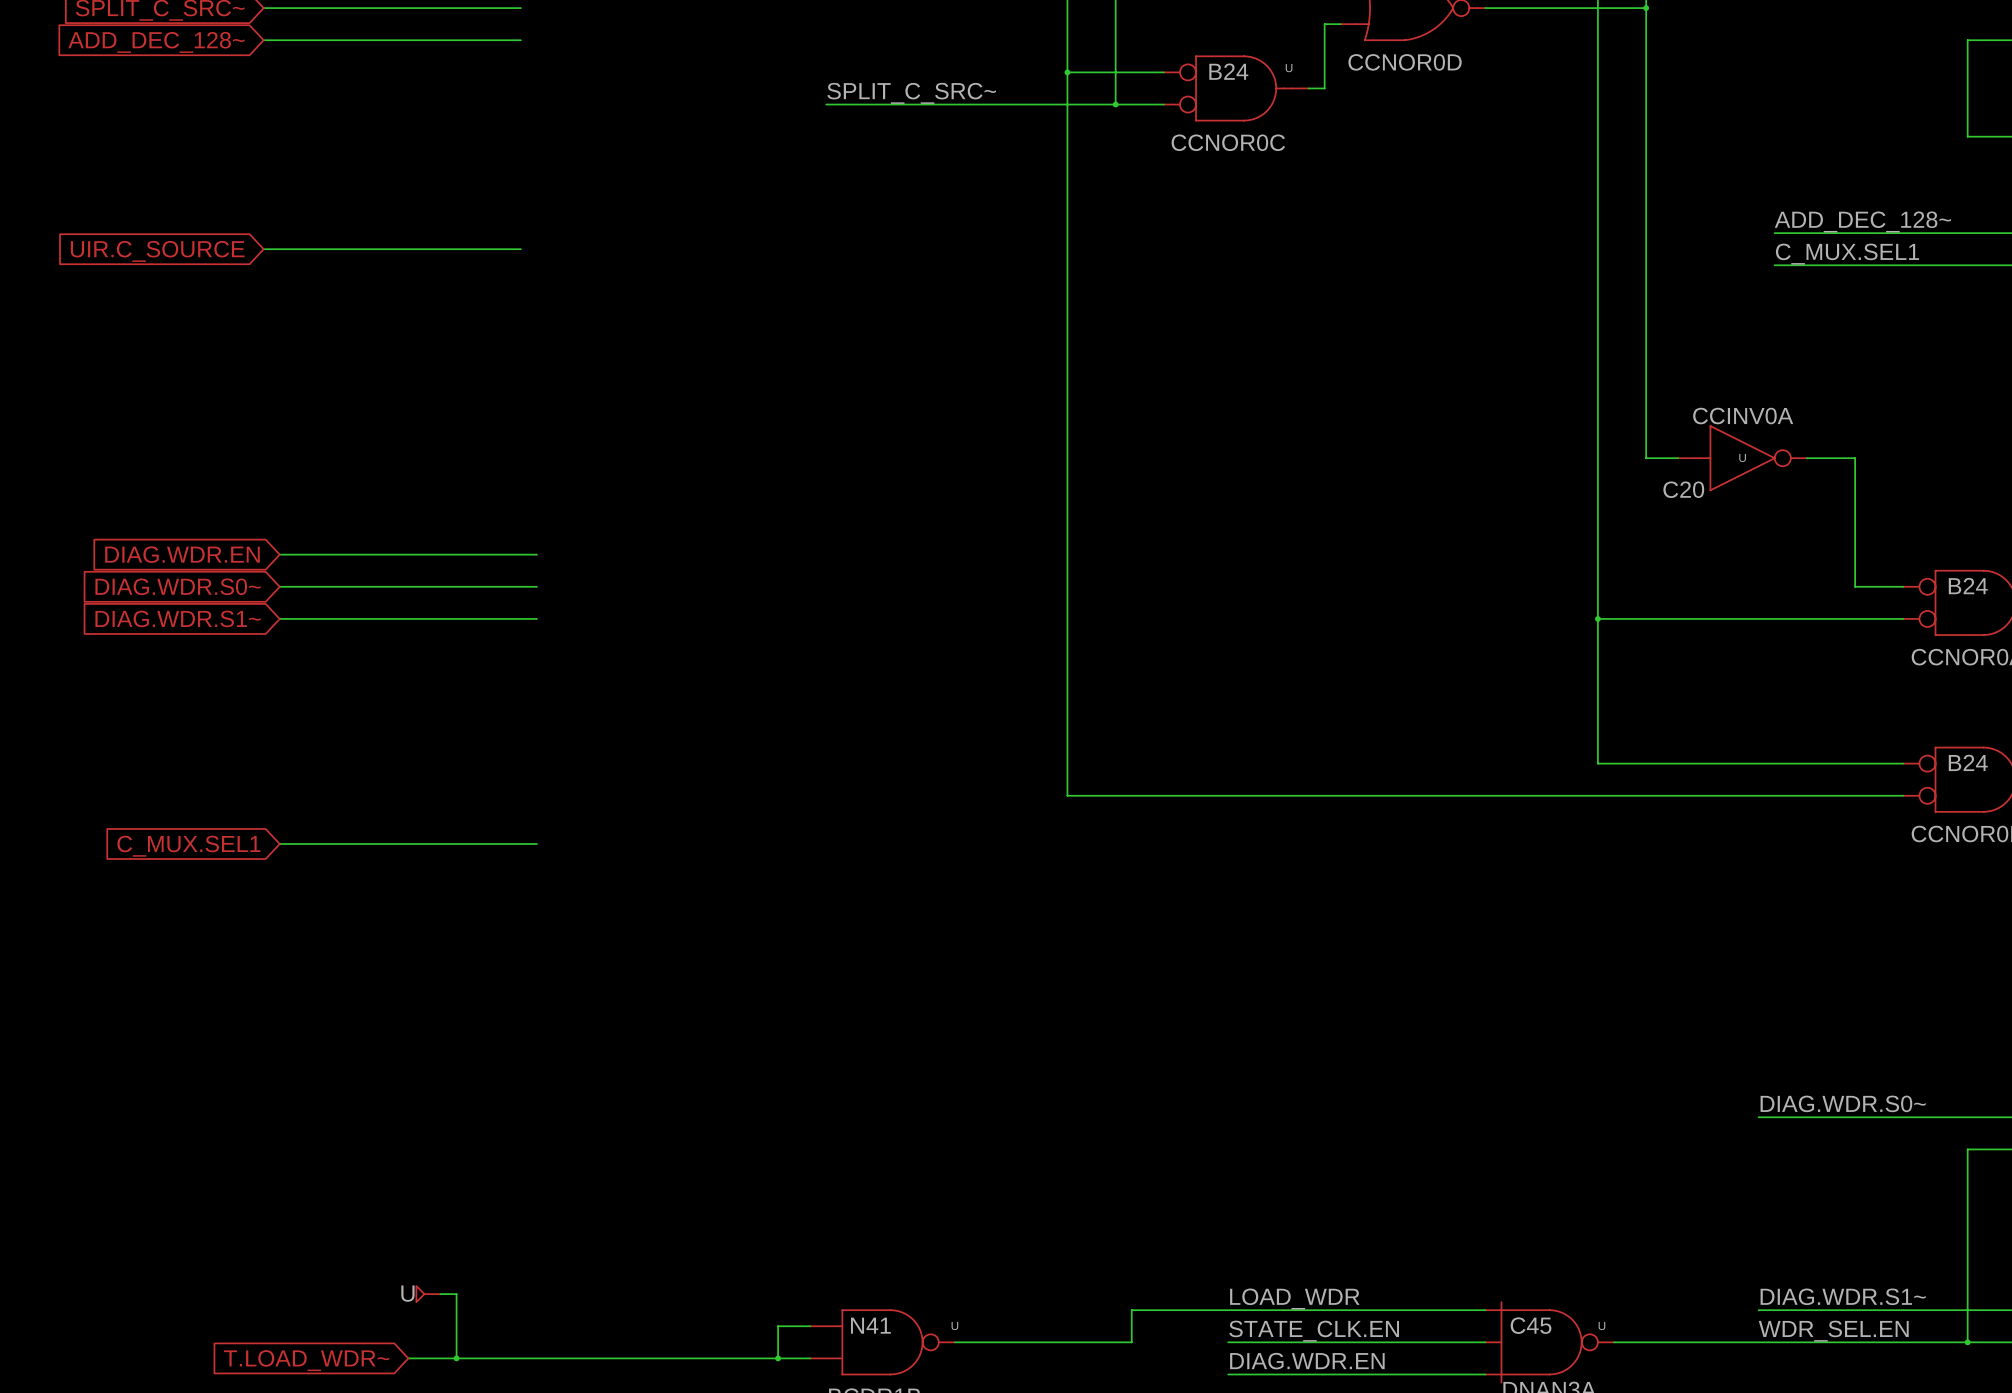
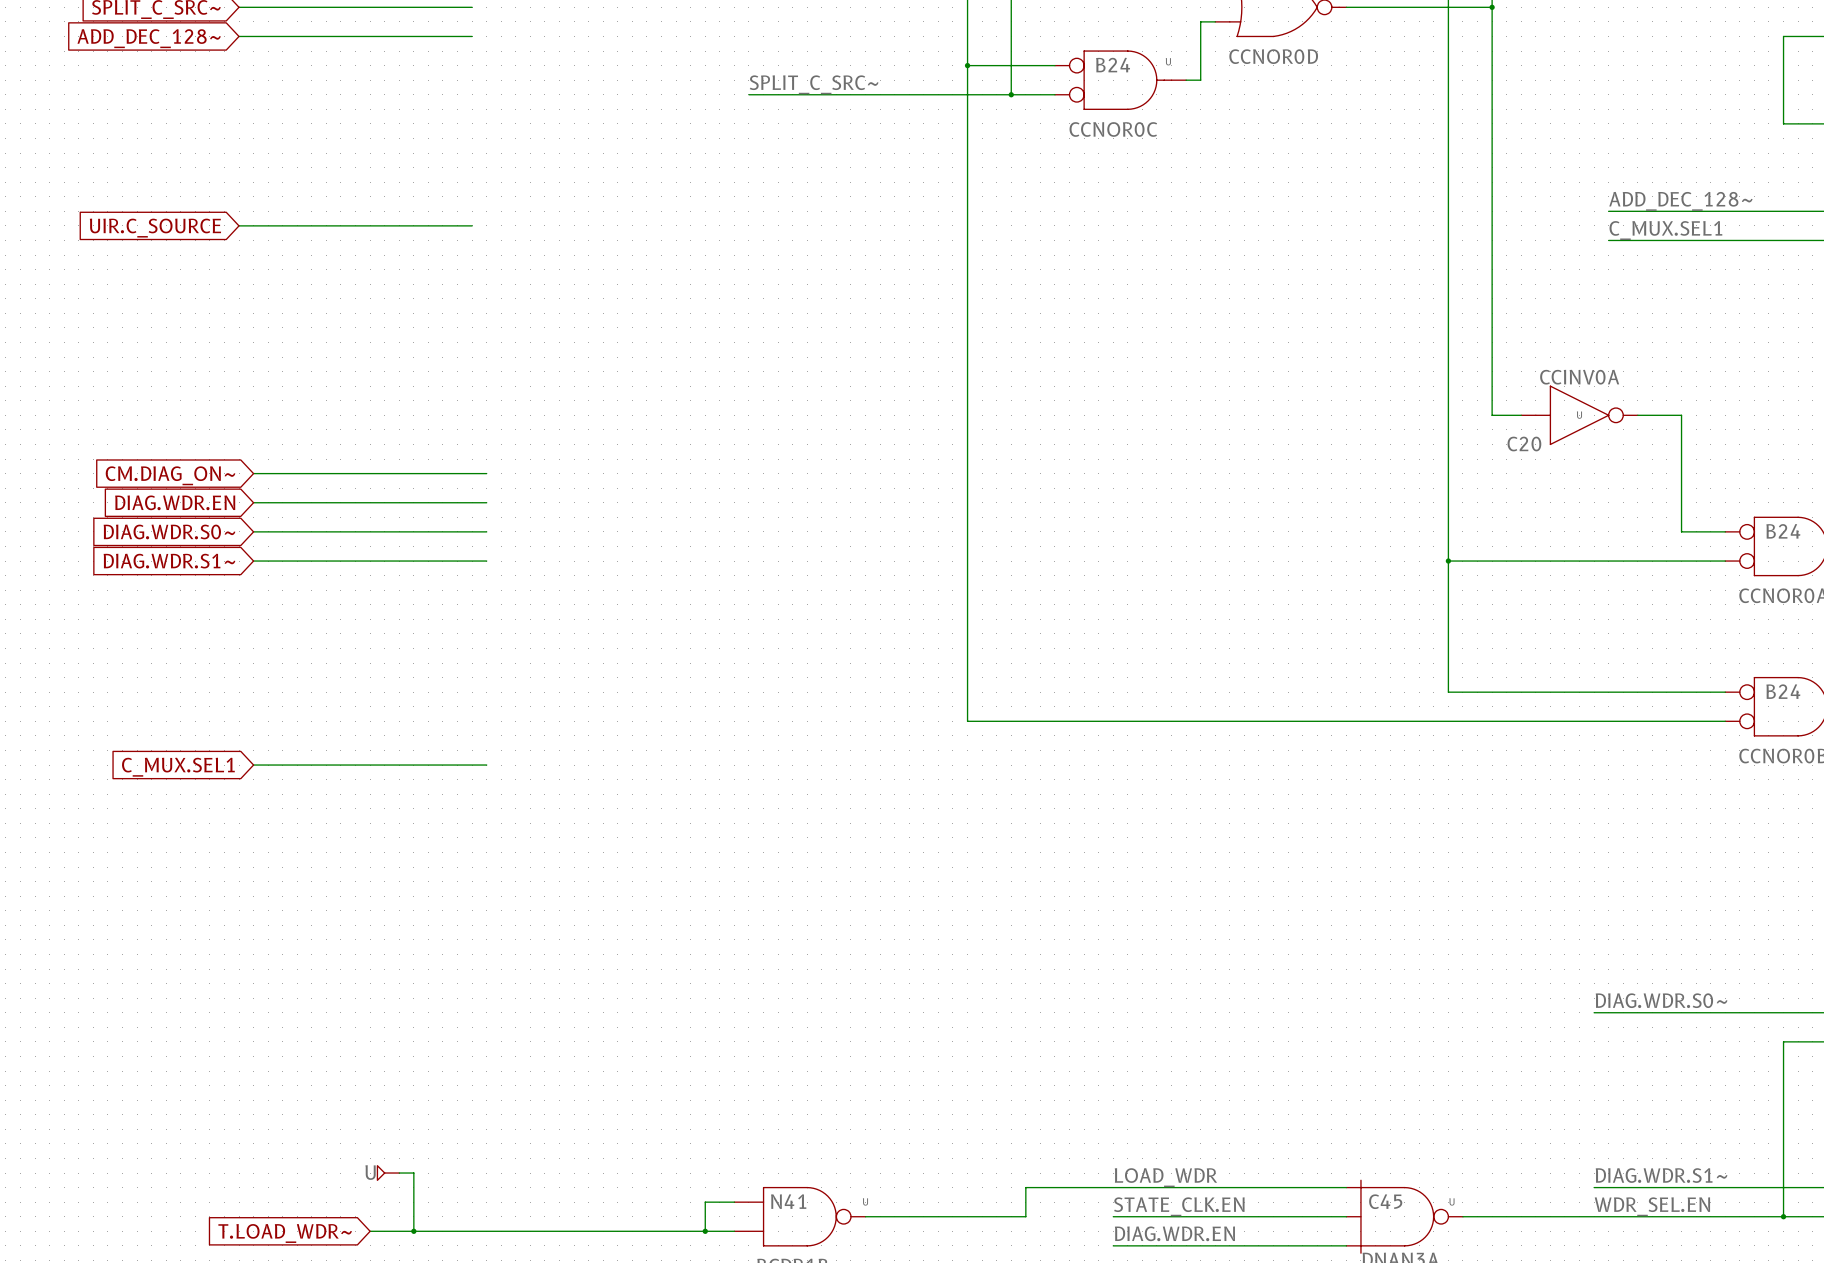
wire: none -> (253, 473) (486, 473)
global label: none -> CM.DIAG_ON~ (170, 475)

